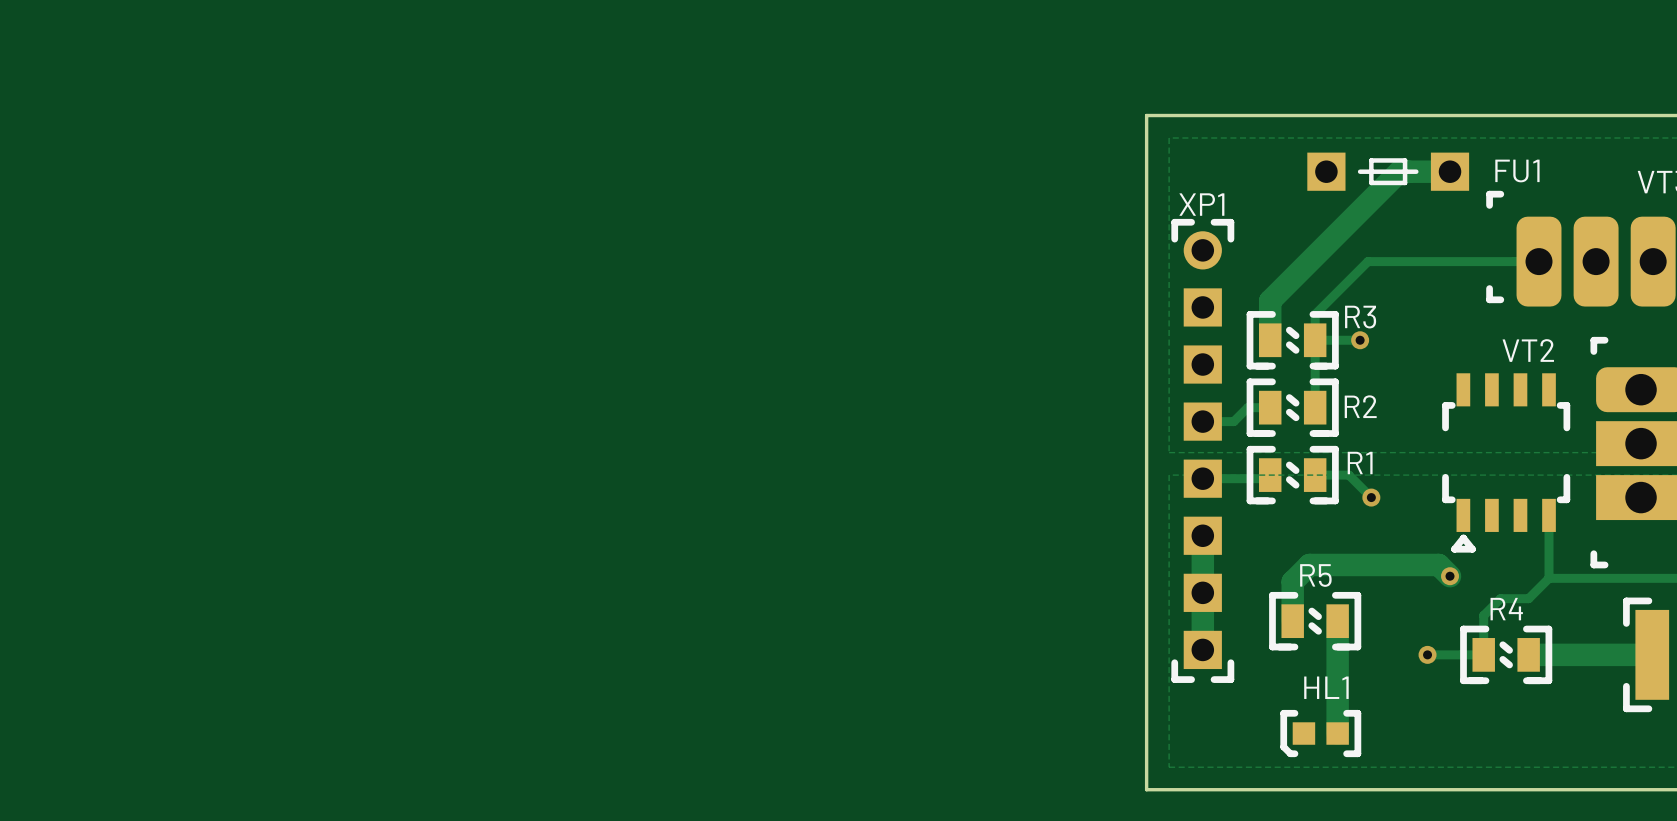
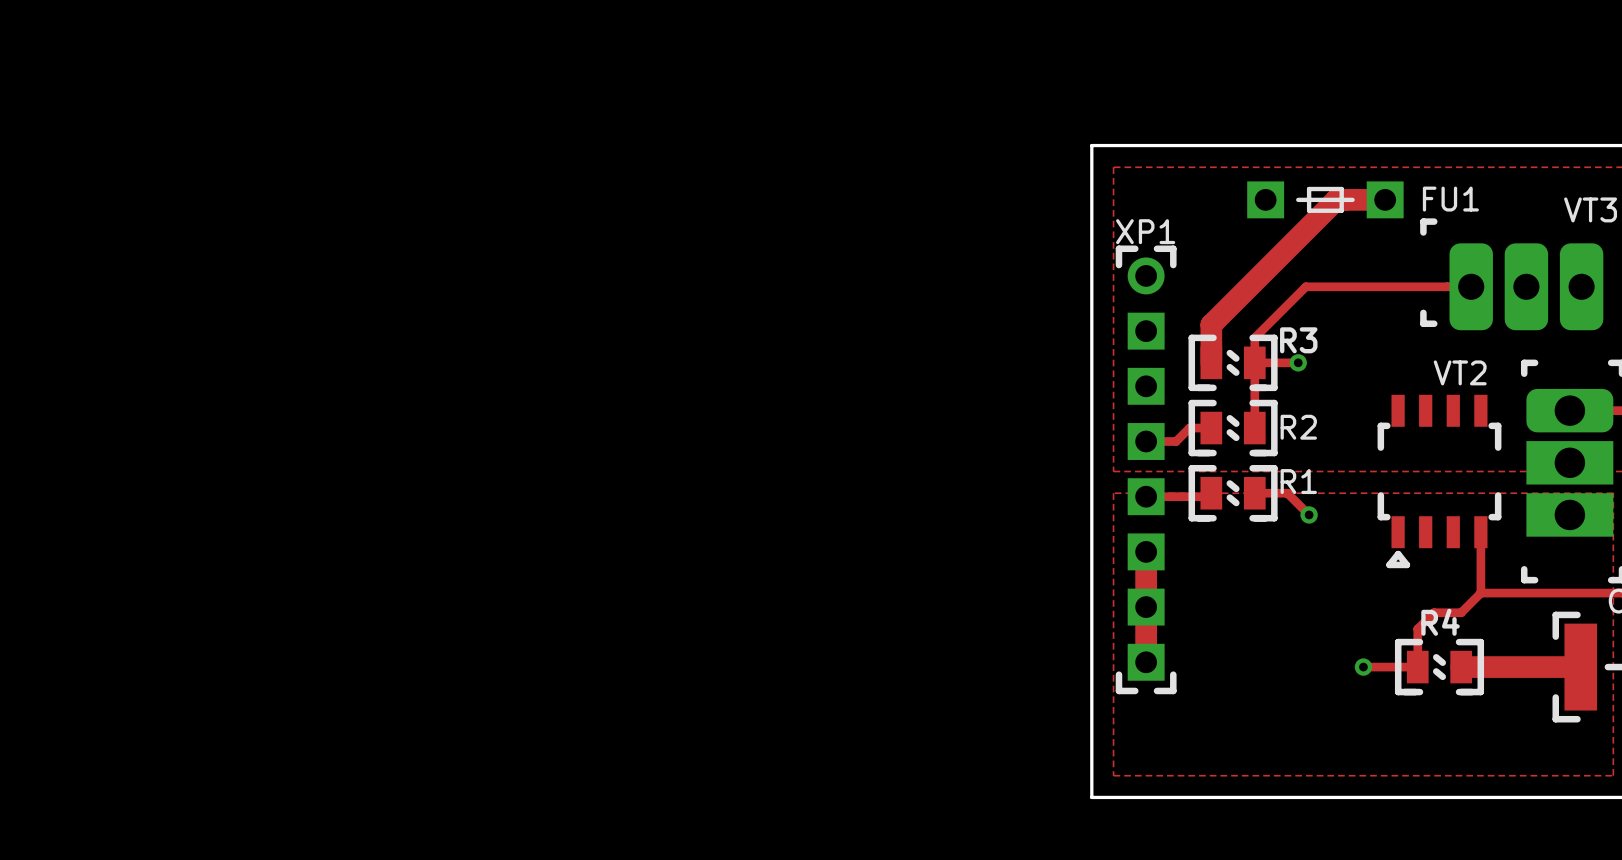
track: (1450, 576) (1438, 564) (1309, 564) (1292, 581) (1292, 621) -> none
via: (1450, 576) -> none
R5: (1315, 621) -> none
track: (1337, 621) (1337, 733) -> none
HL1: (1320, 733) -> none

